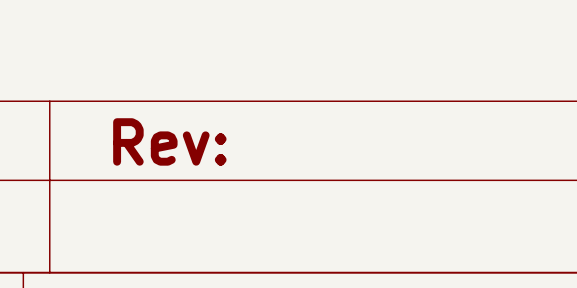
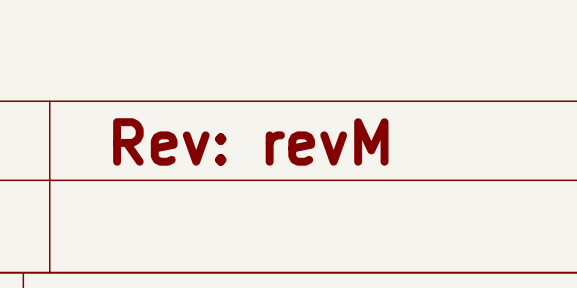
title block: Rev: (169, 141) -> Rev: revM (250, 141)

